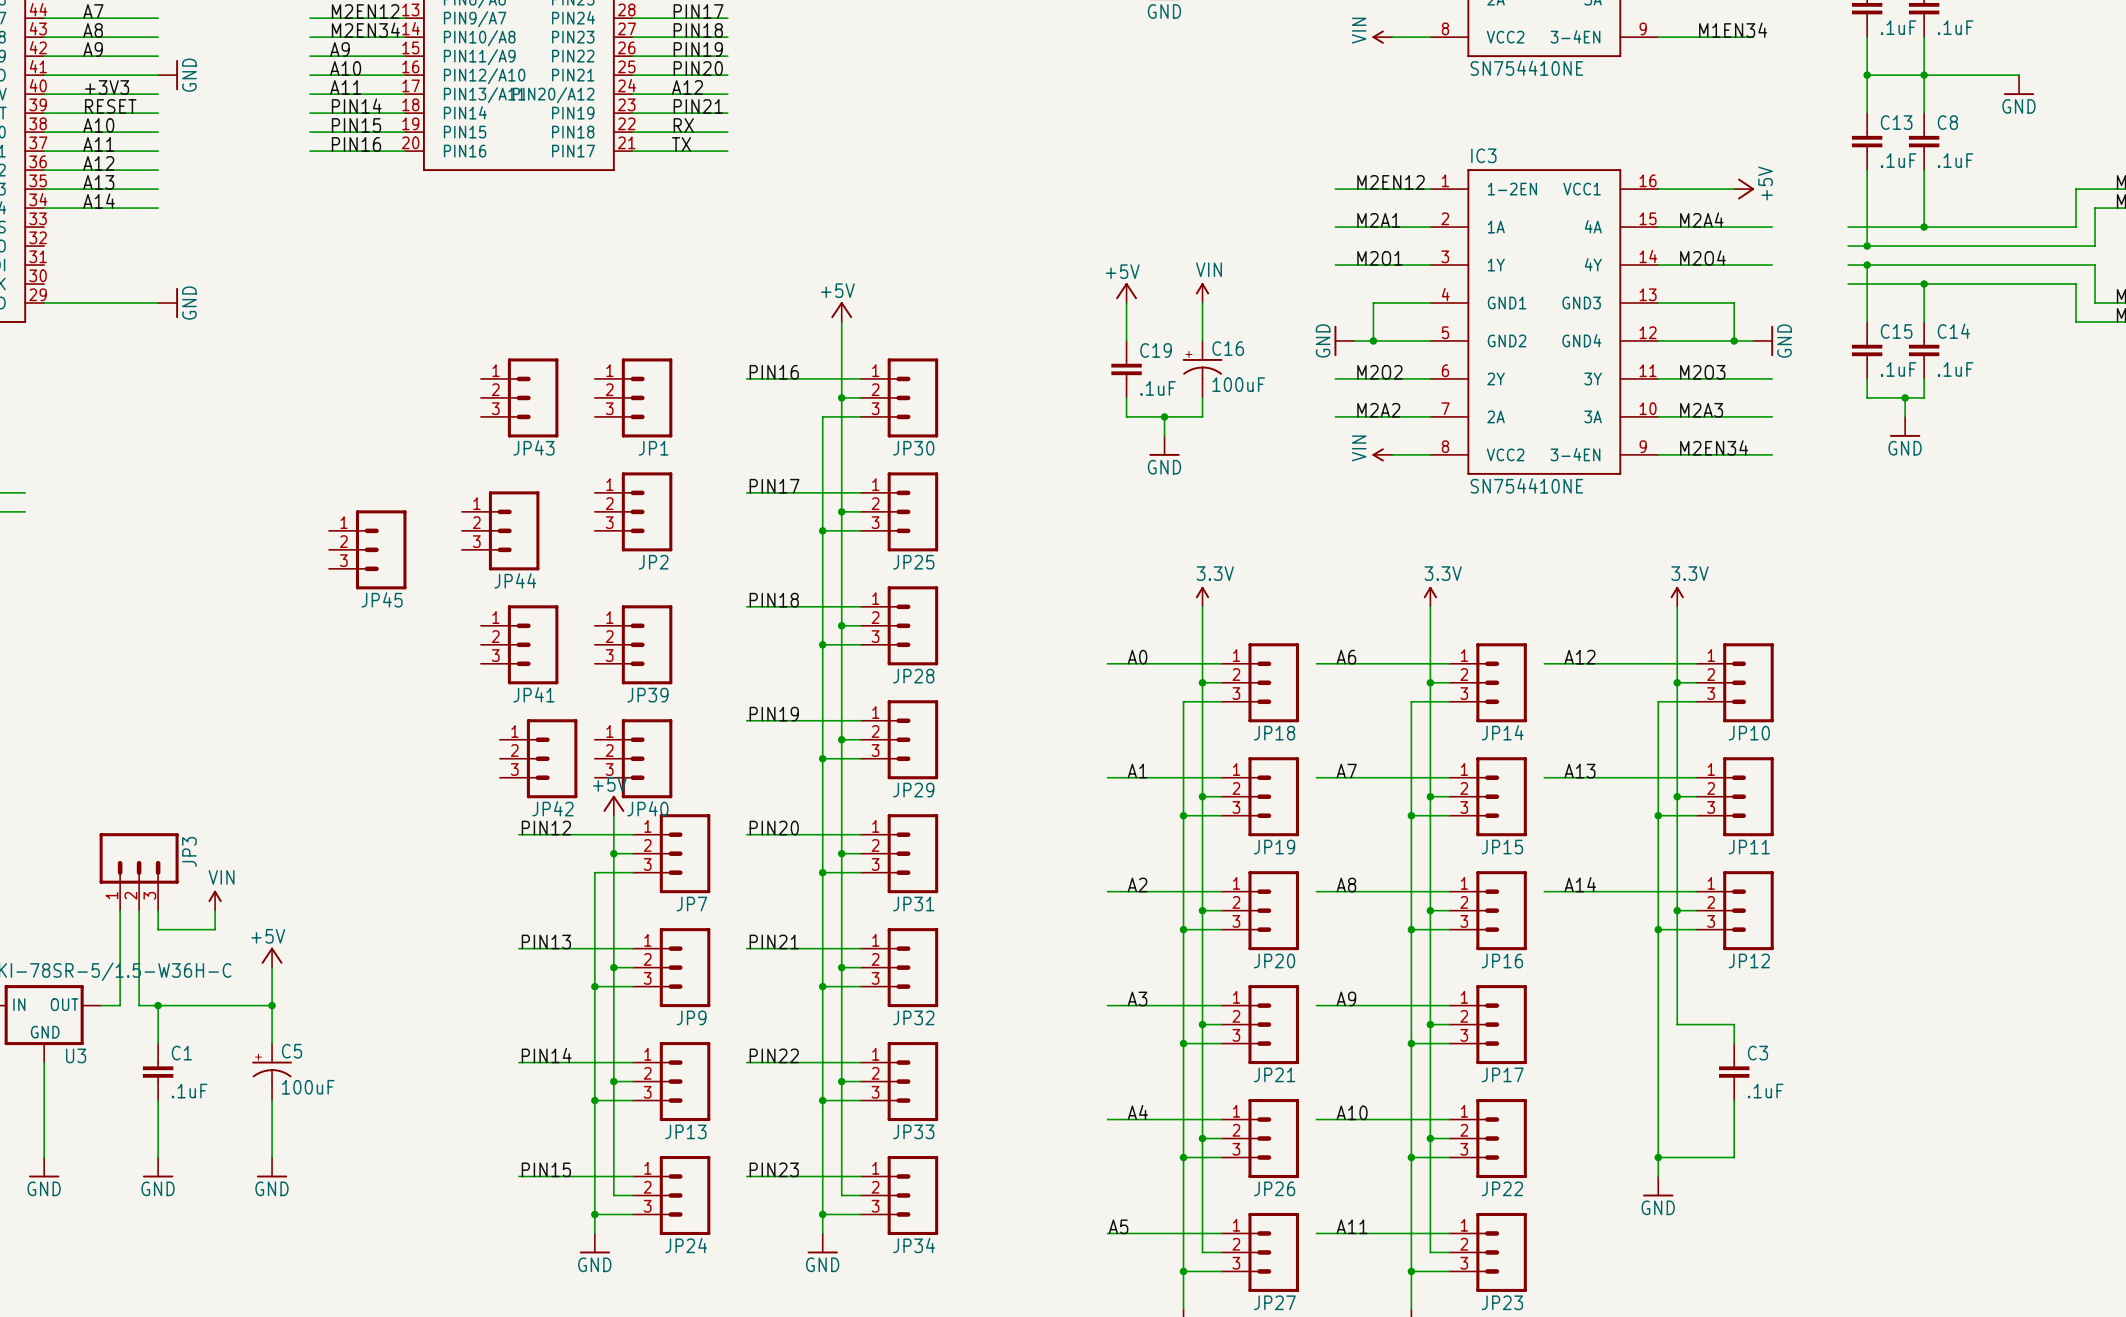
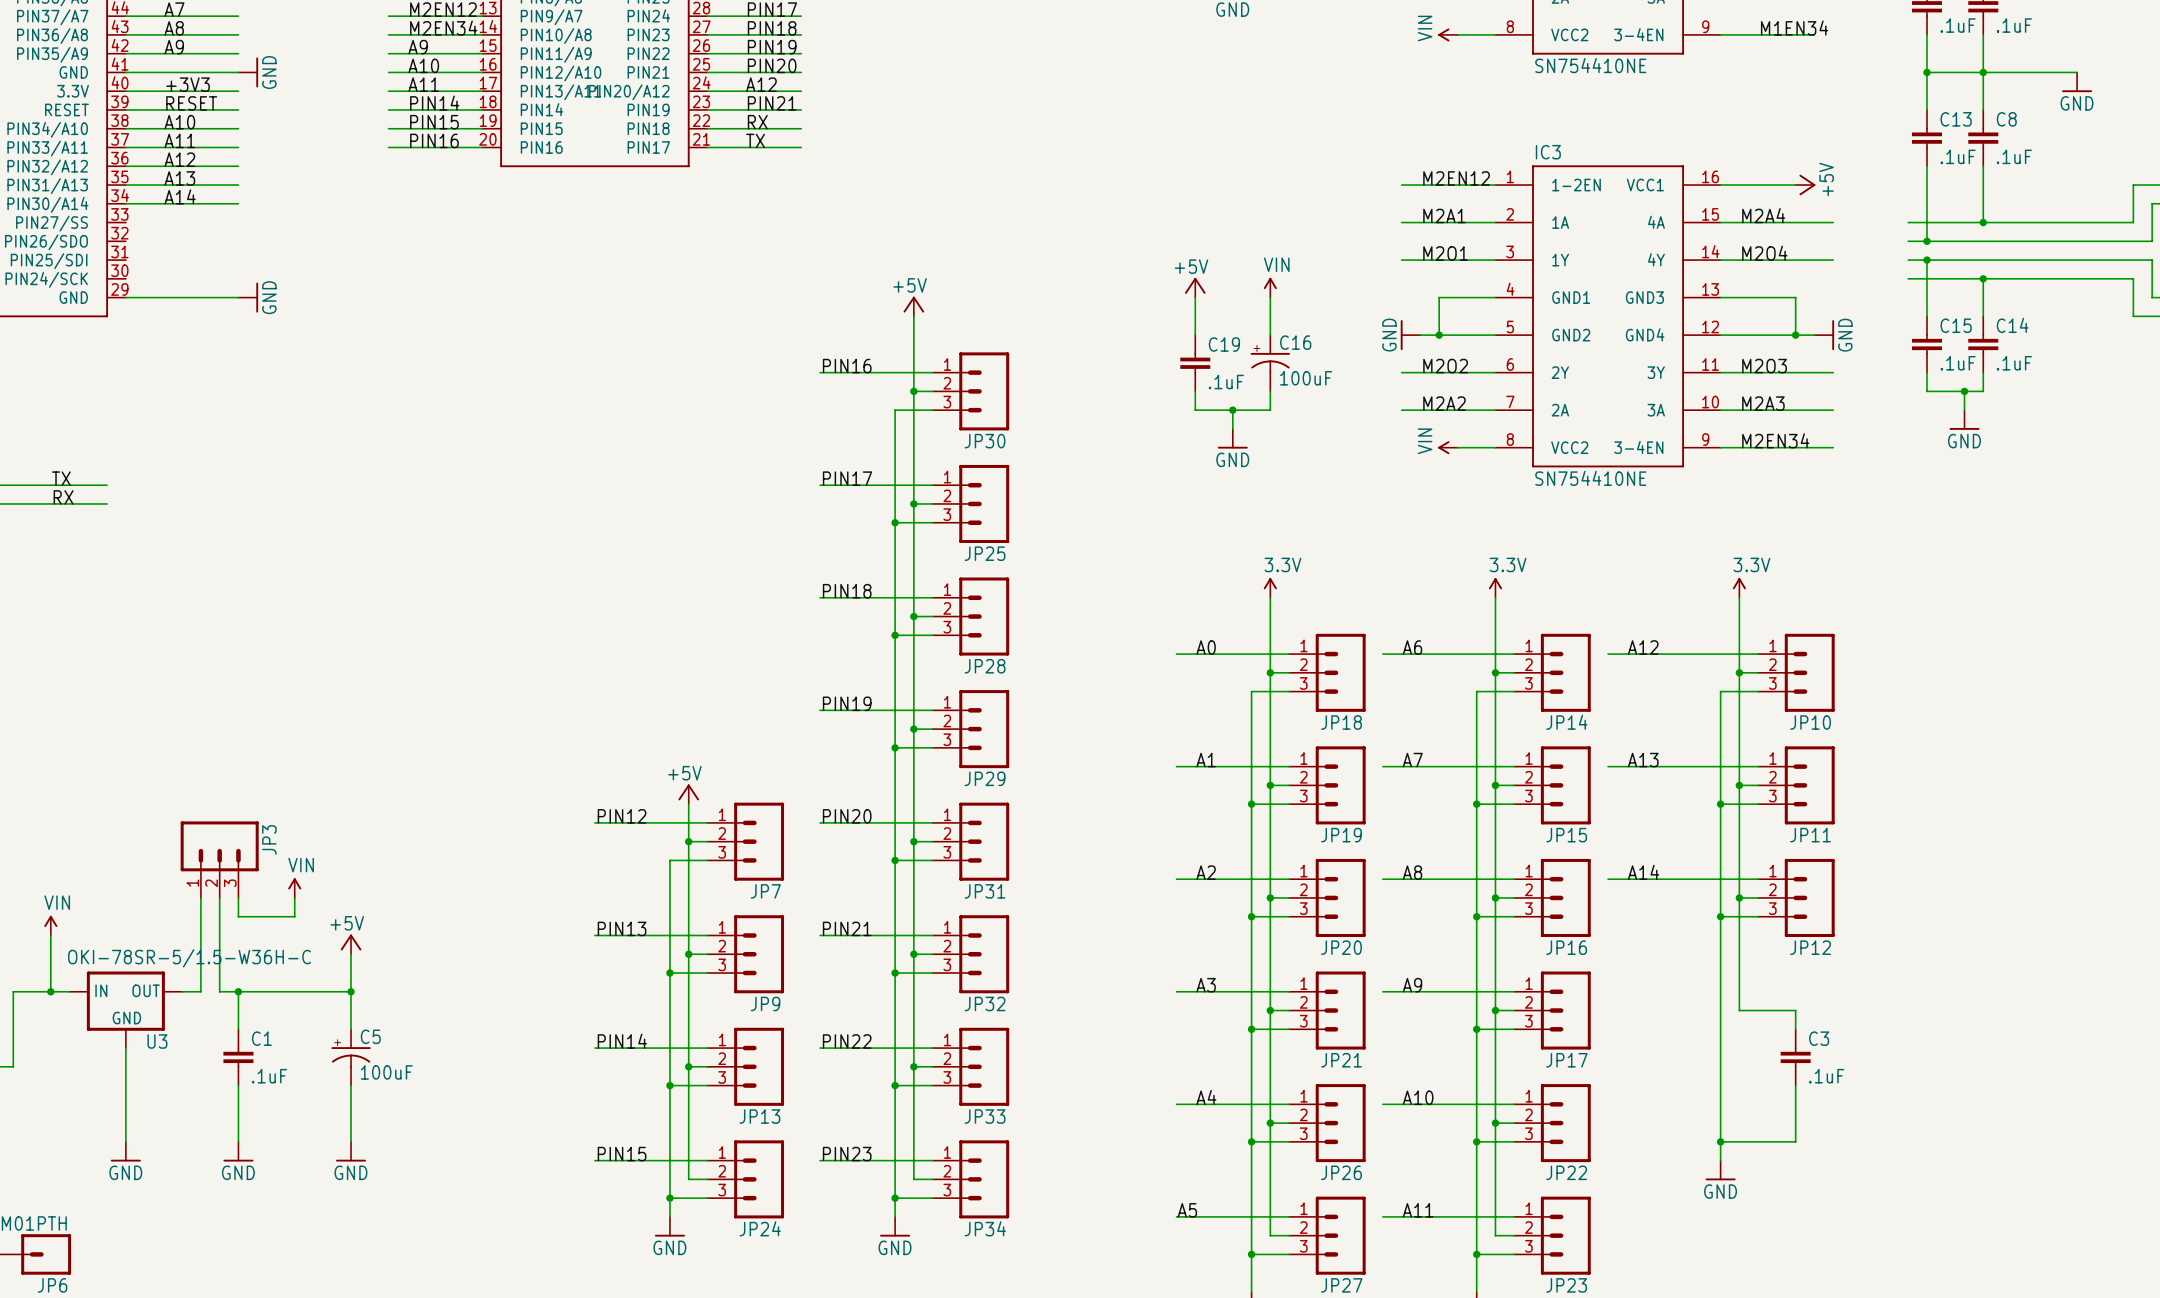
JP43: (519, 397) -> none
JP1: (633, 397) -> none
JP2: (633, 511) -> none
JP44: (500, 530) -> none
JP45: (367, 549) -> none
JP41: (519, 644) -> none
JP39: (633, 644) -> none
JP42: (538, 758) -> none
JP40: (633, 758) -> none

